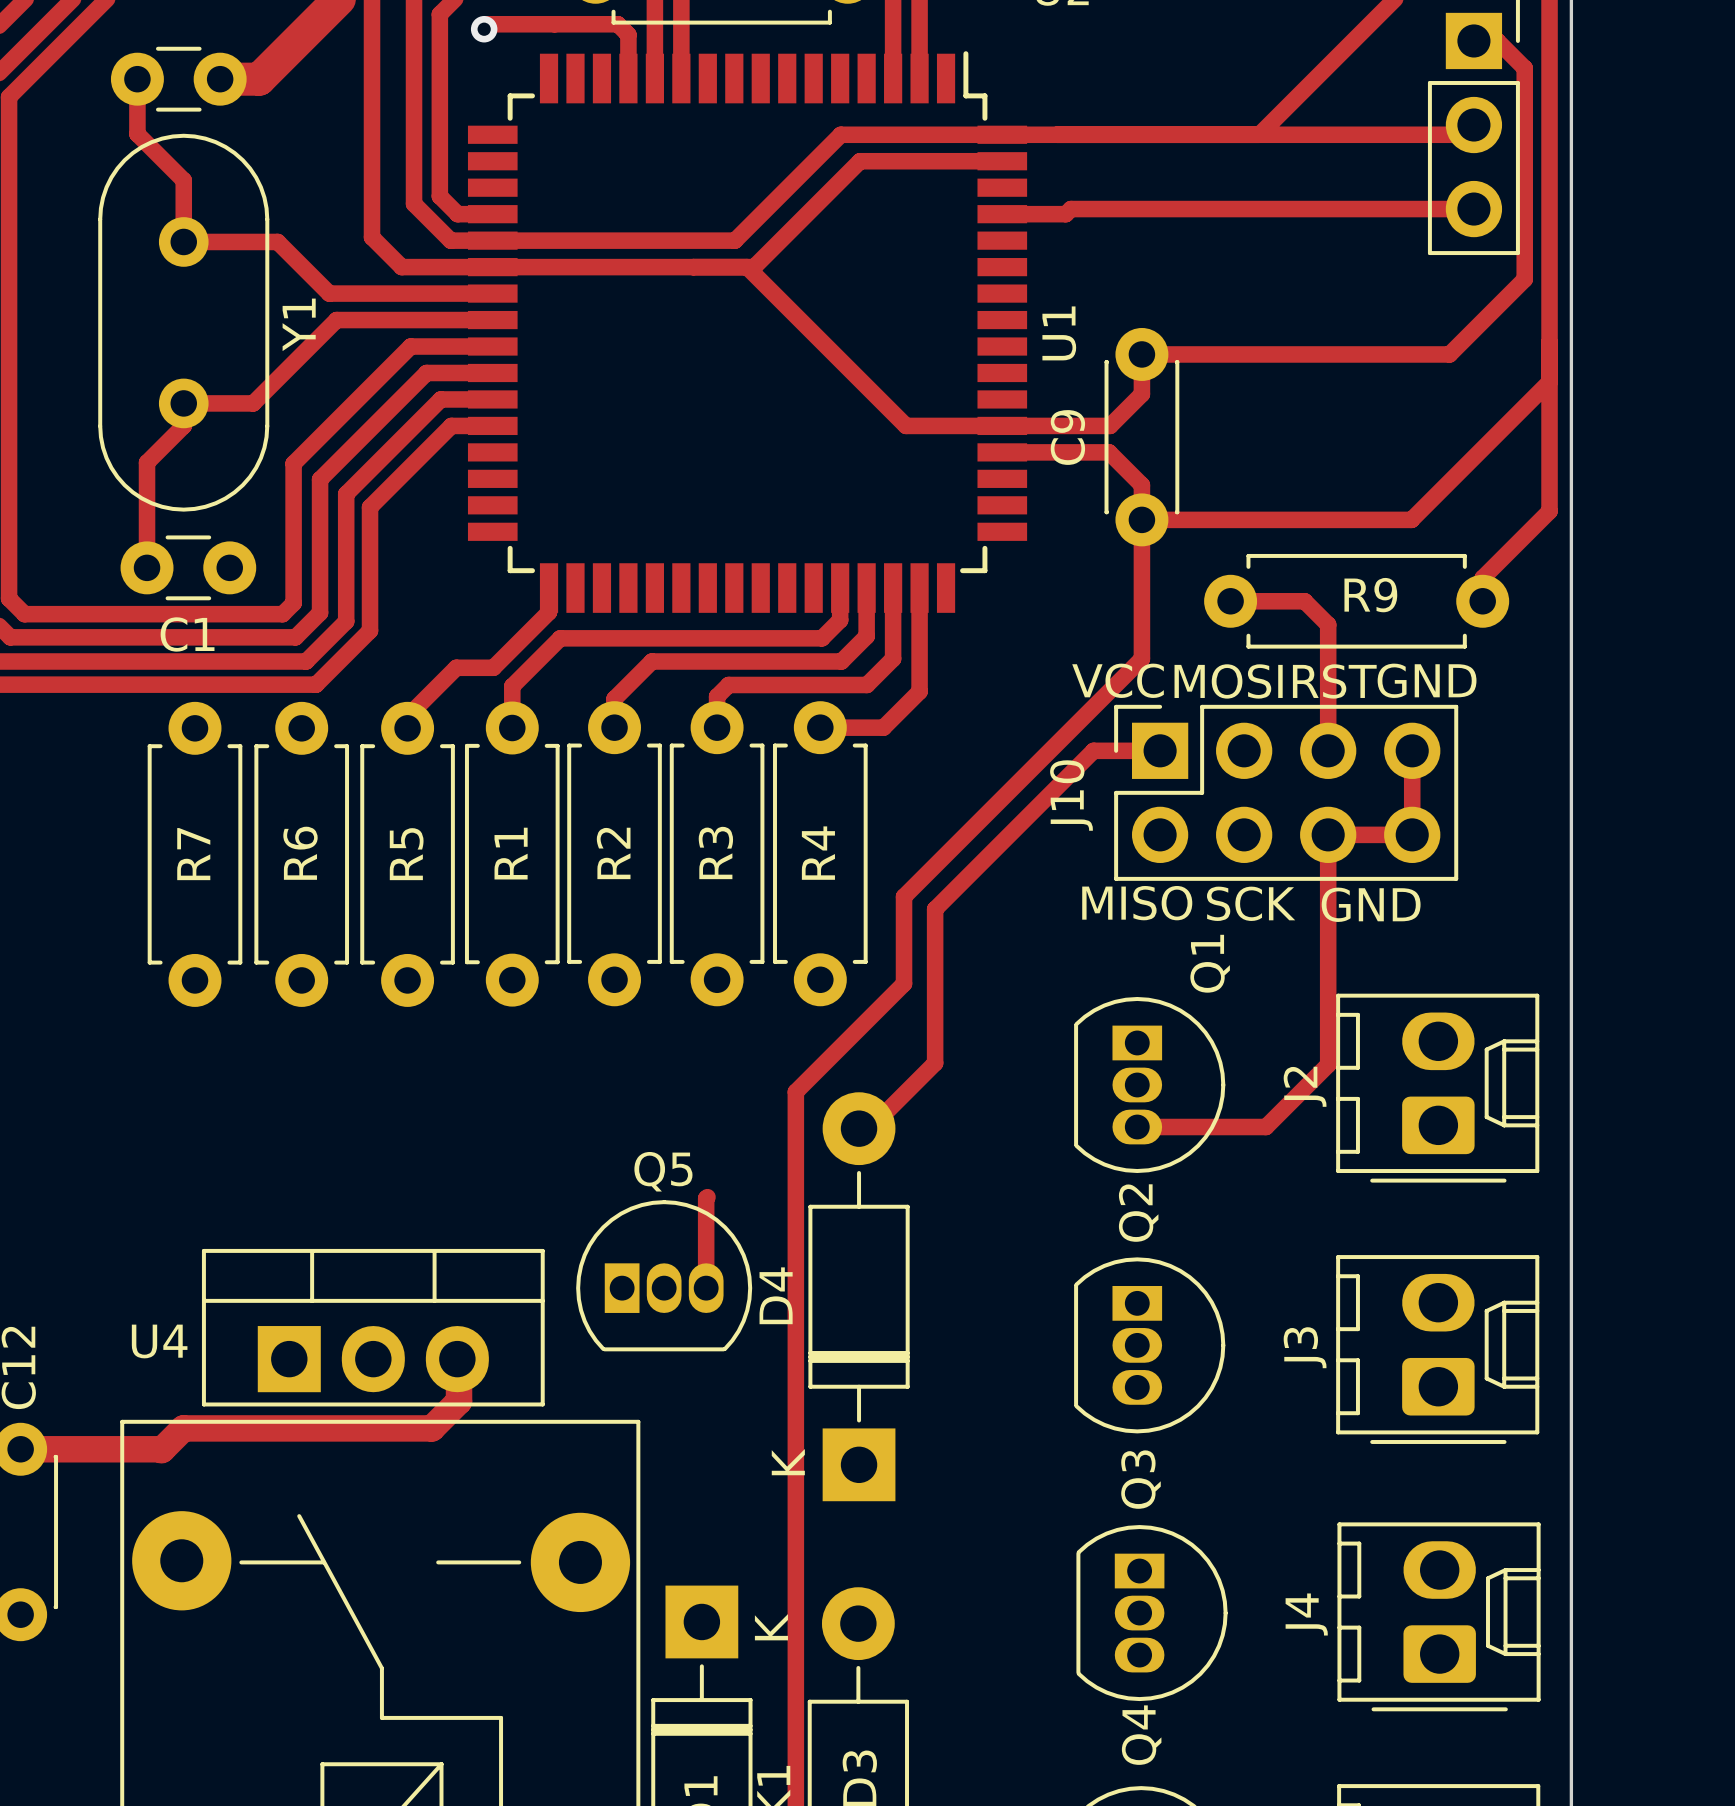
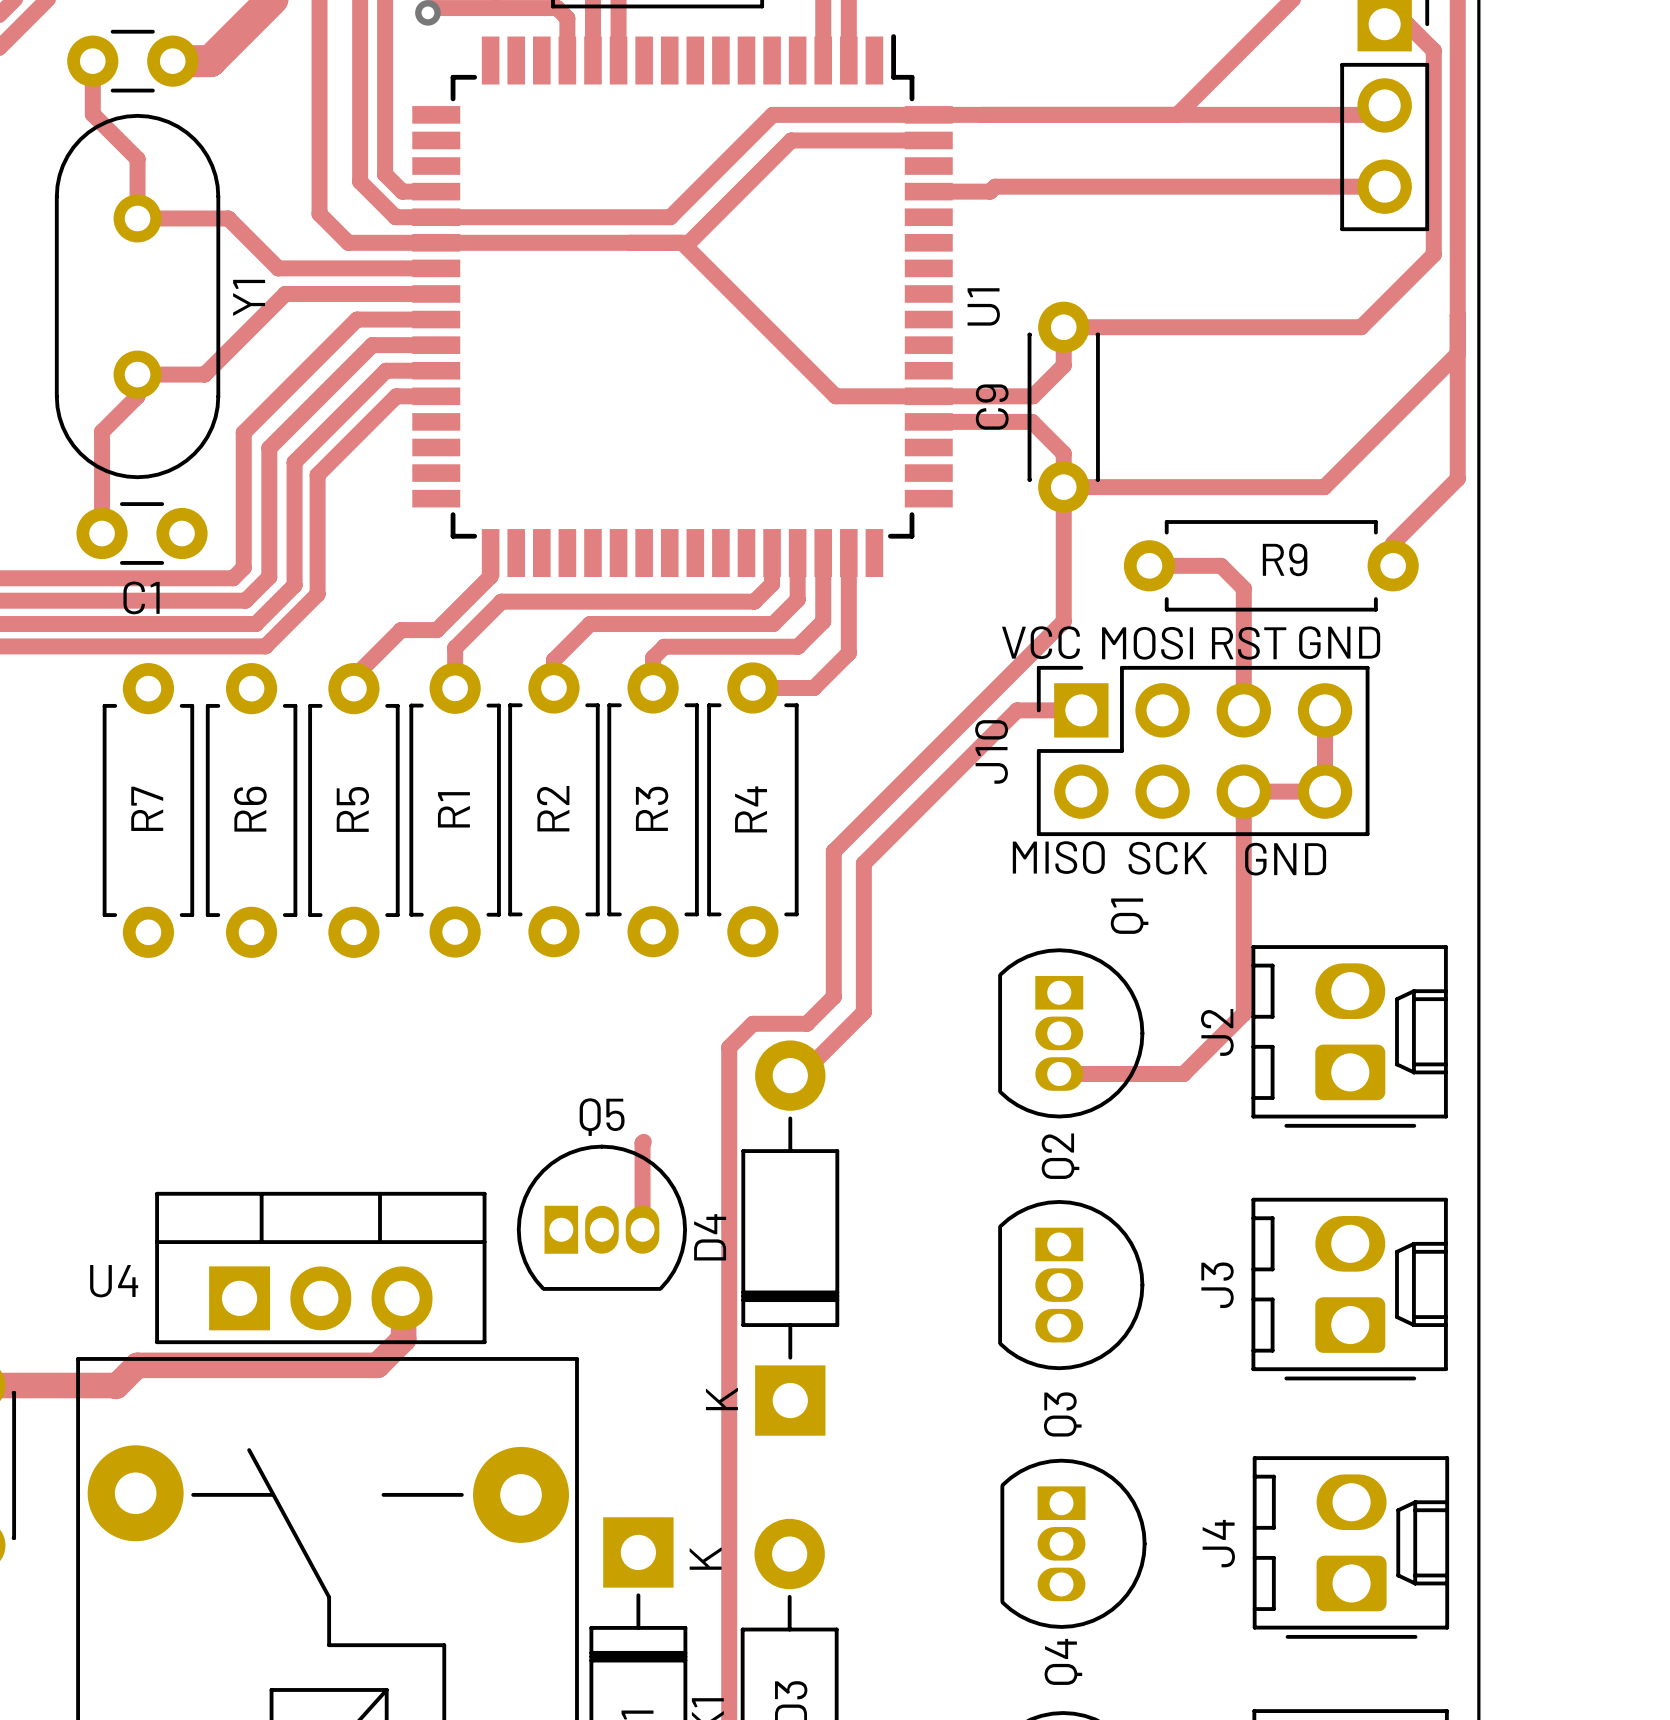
track: (904, 983) (795, 1091) (795, 1099) -> (833, 935) (833, 996) (806, 1023) (752, 1023) (729, 1047)

